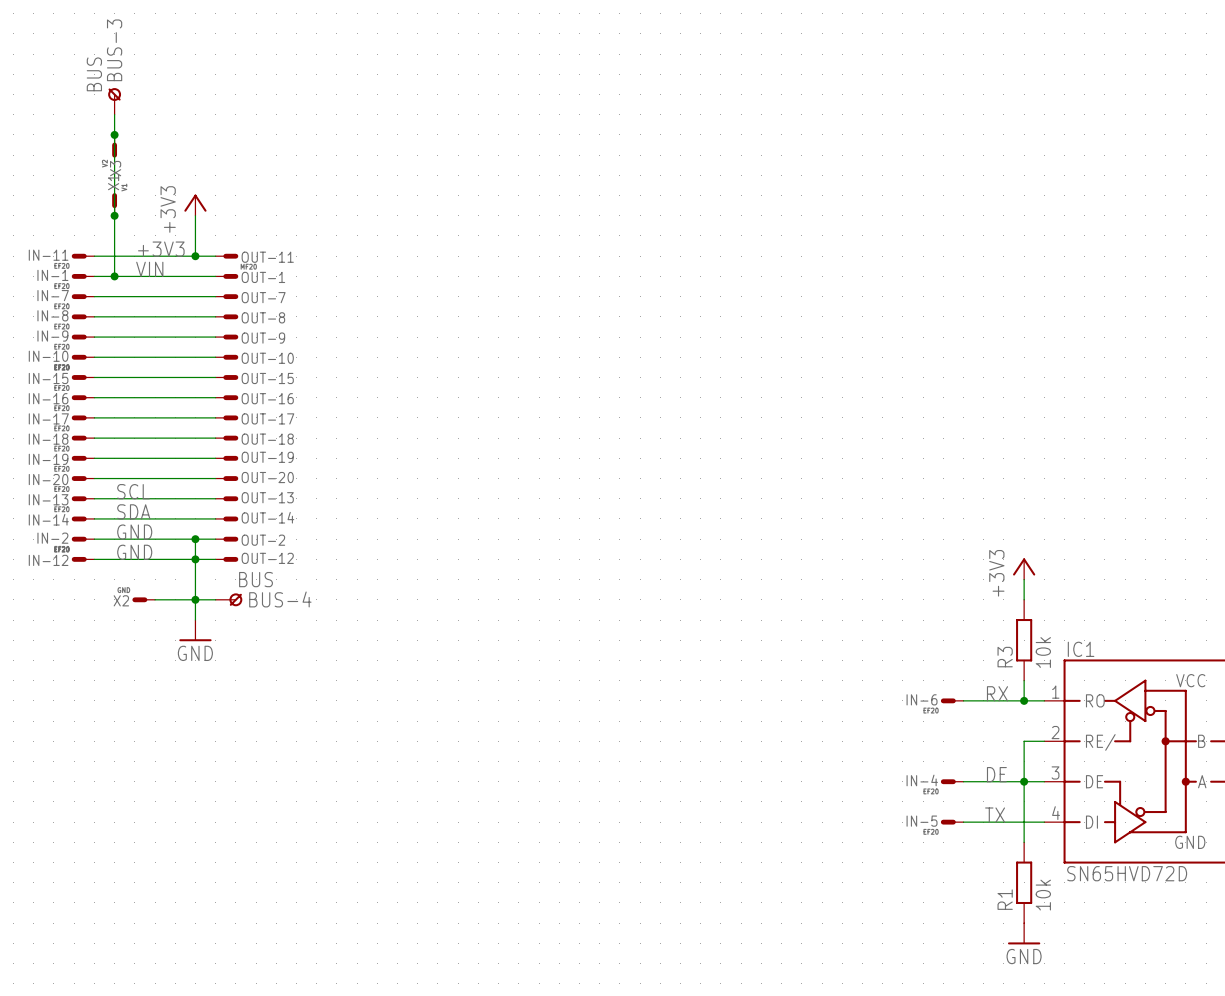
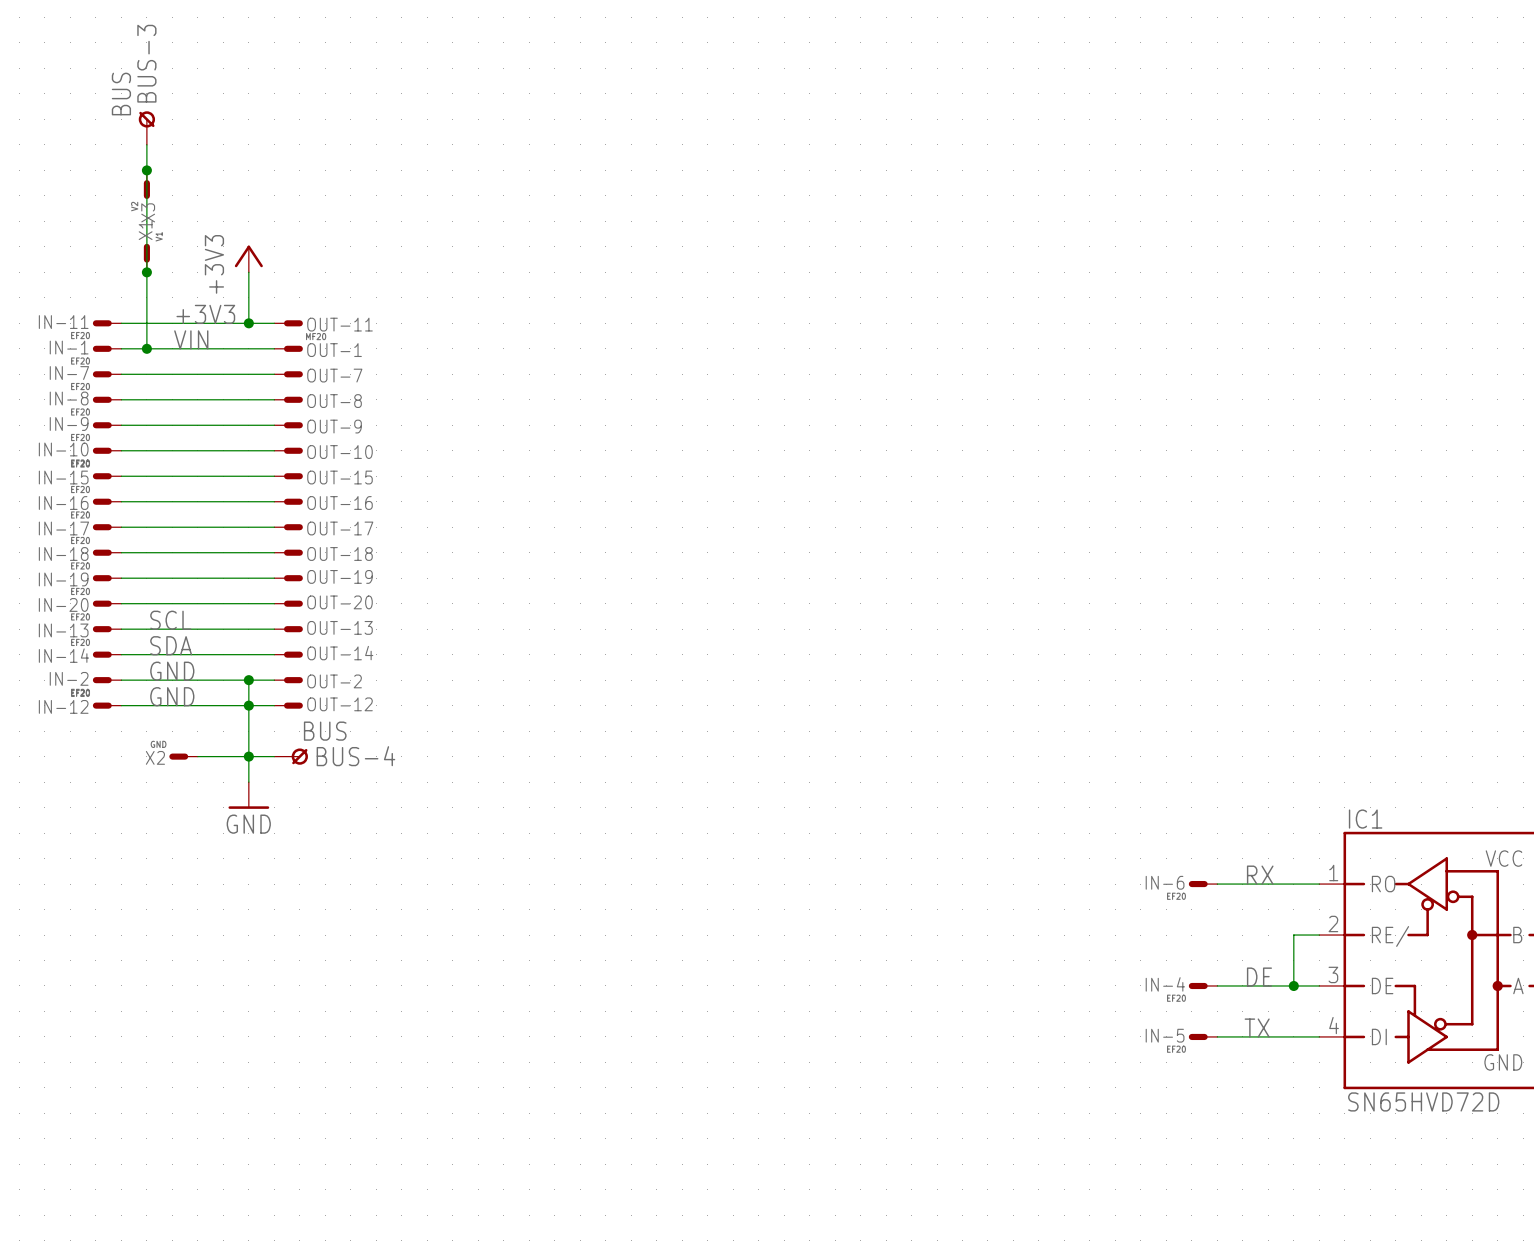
power symbol: +3V3 (1024, 568) -> none
wire: (1024, 579) (1024, 599) -> none
R3: 10k (1024, 640) -> none
wire: (1024, 680) (1024, 700) -> none
junction: (1024, 700) -> none
wire: (1024, 781) (1024, 842) -> none
R1: 10k (1024, 882) -> none
power symbol: GND (1024, 933) -> none

